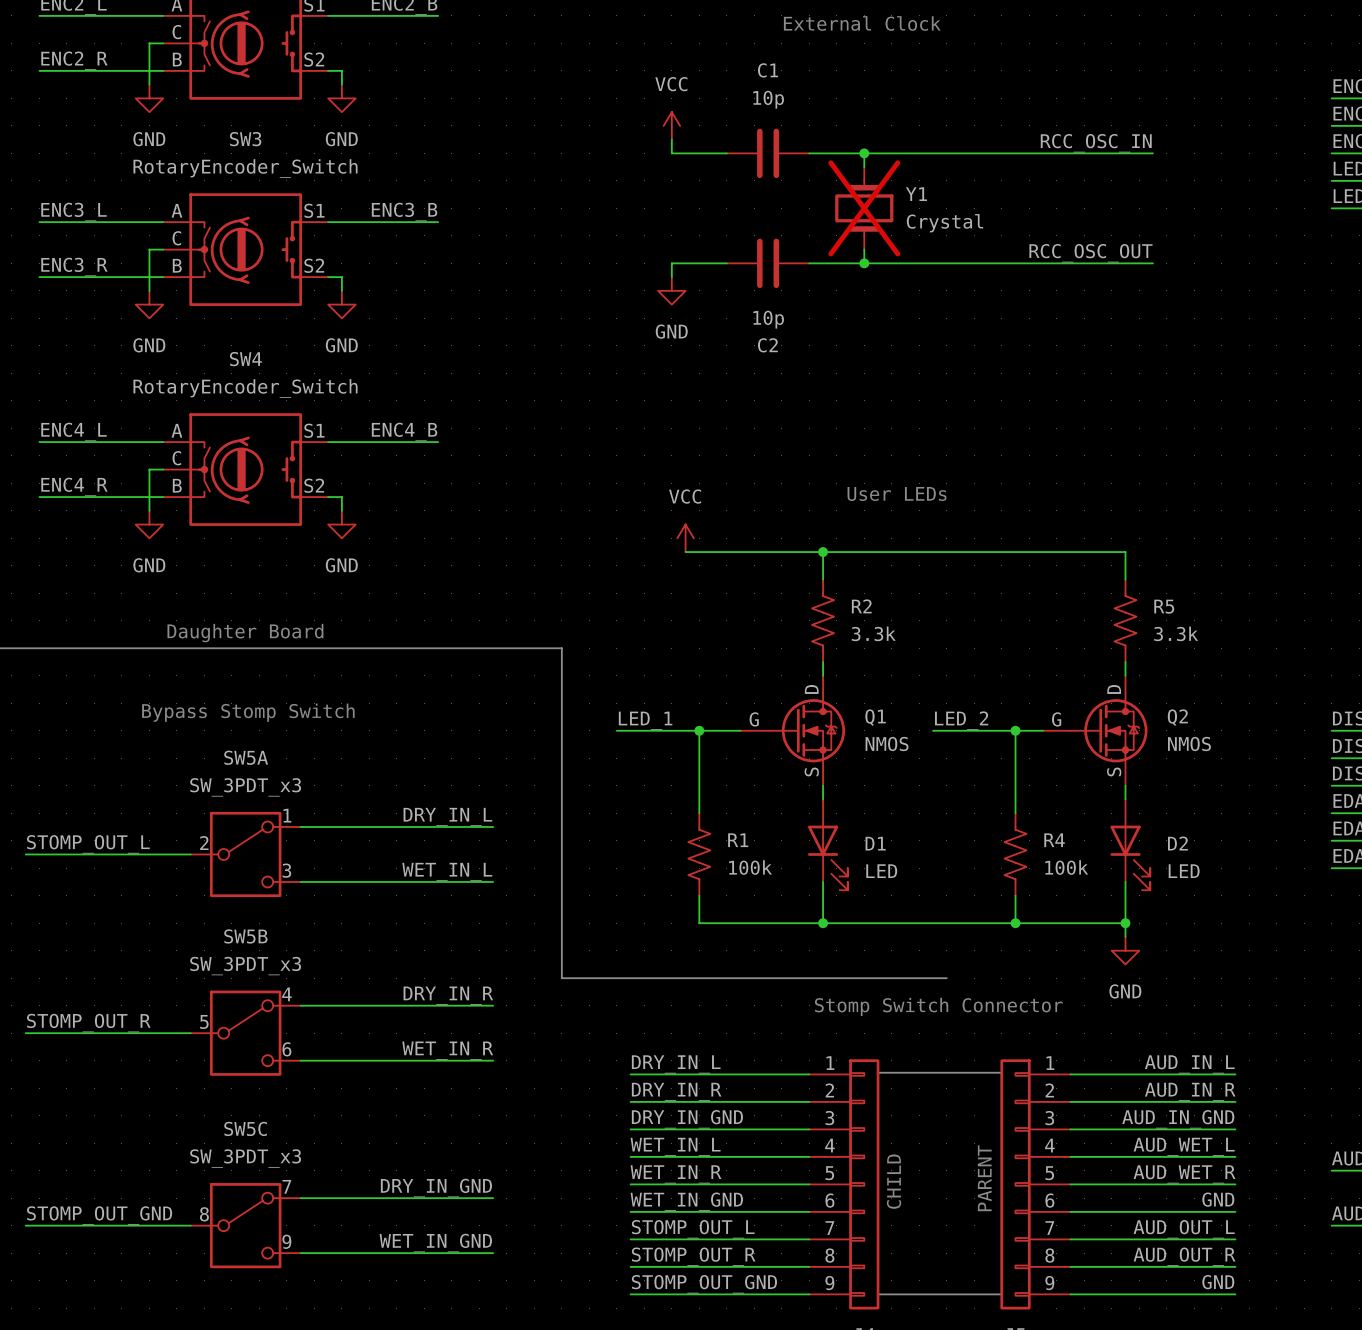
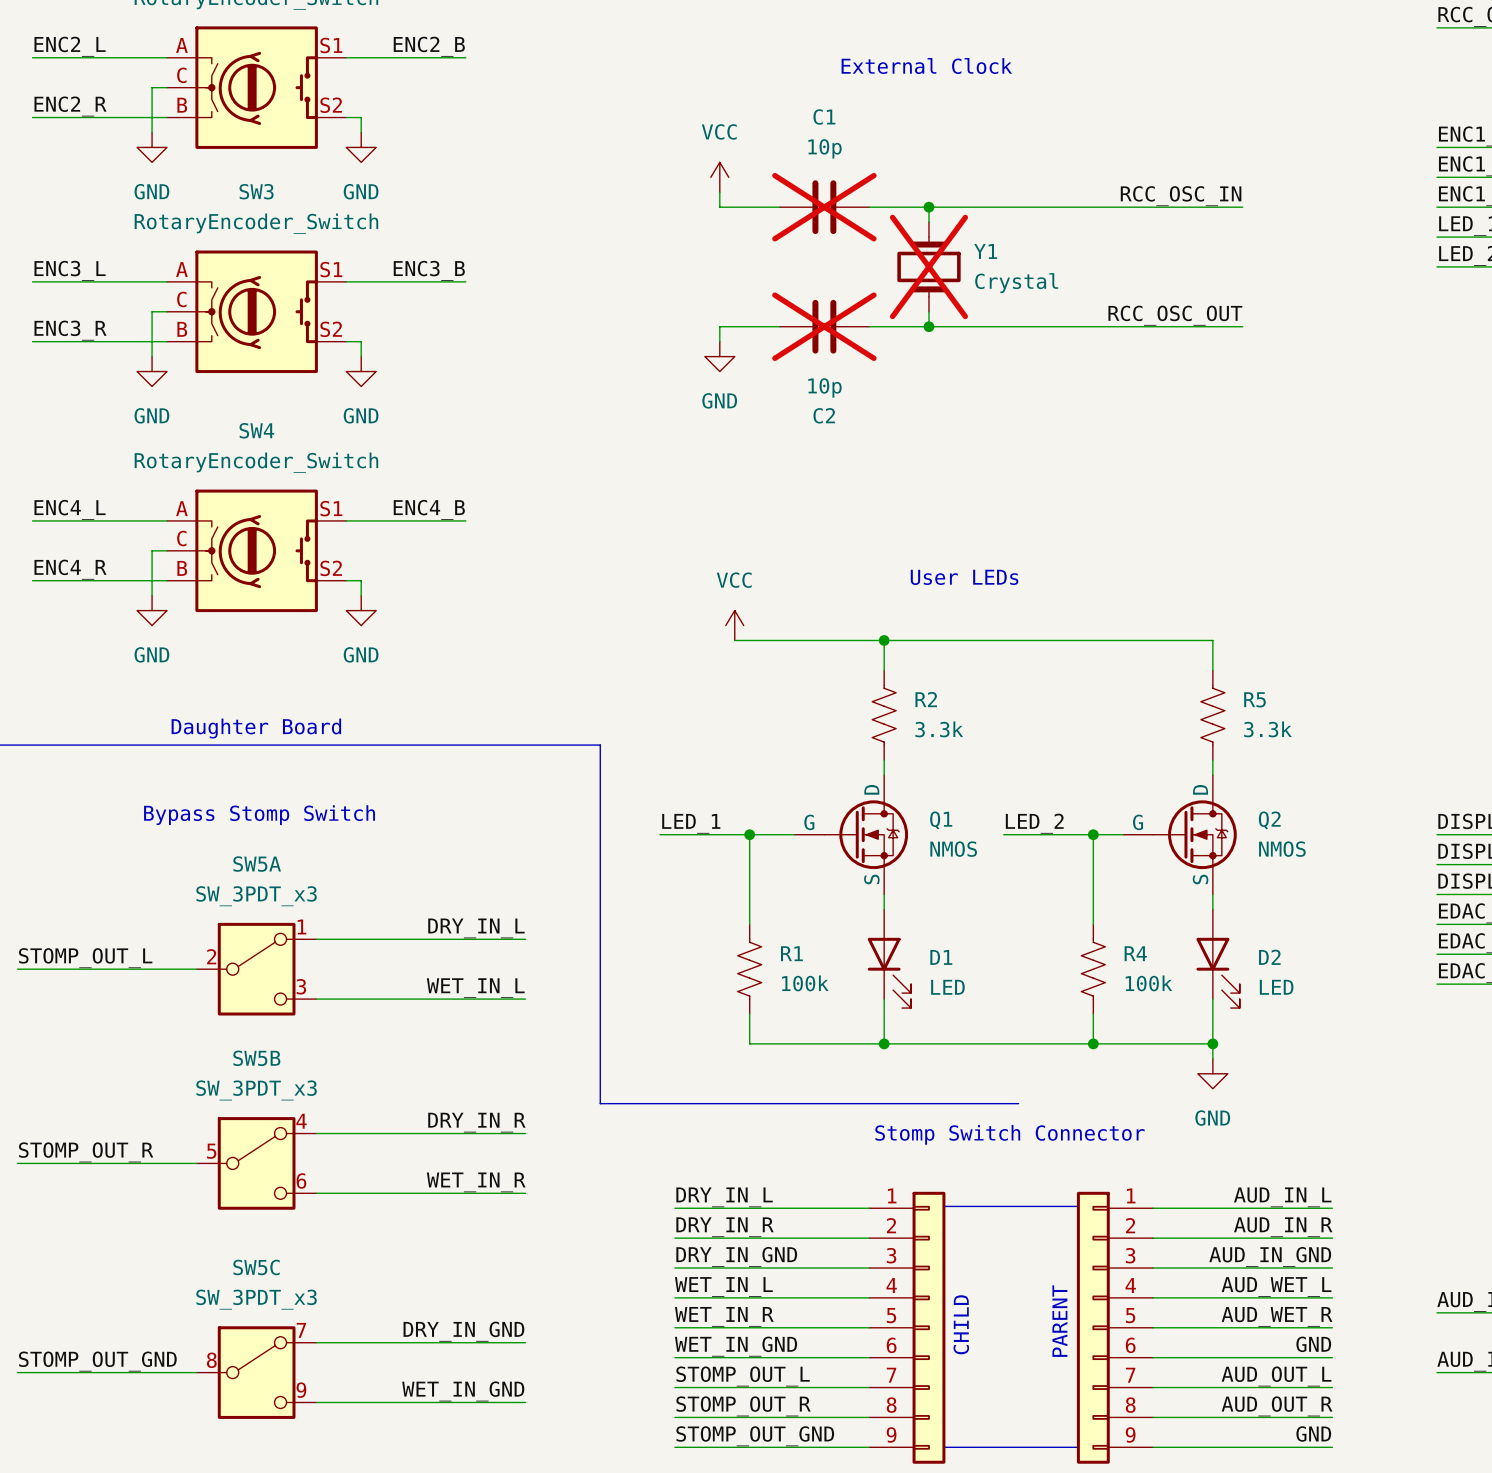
C1 do-not-place cross: none -> (824, 207)
C2 do-not-place cross: none -> (824, 326)

